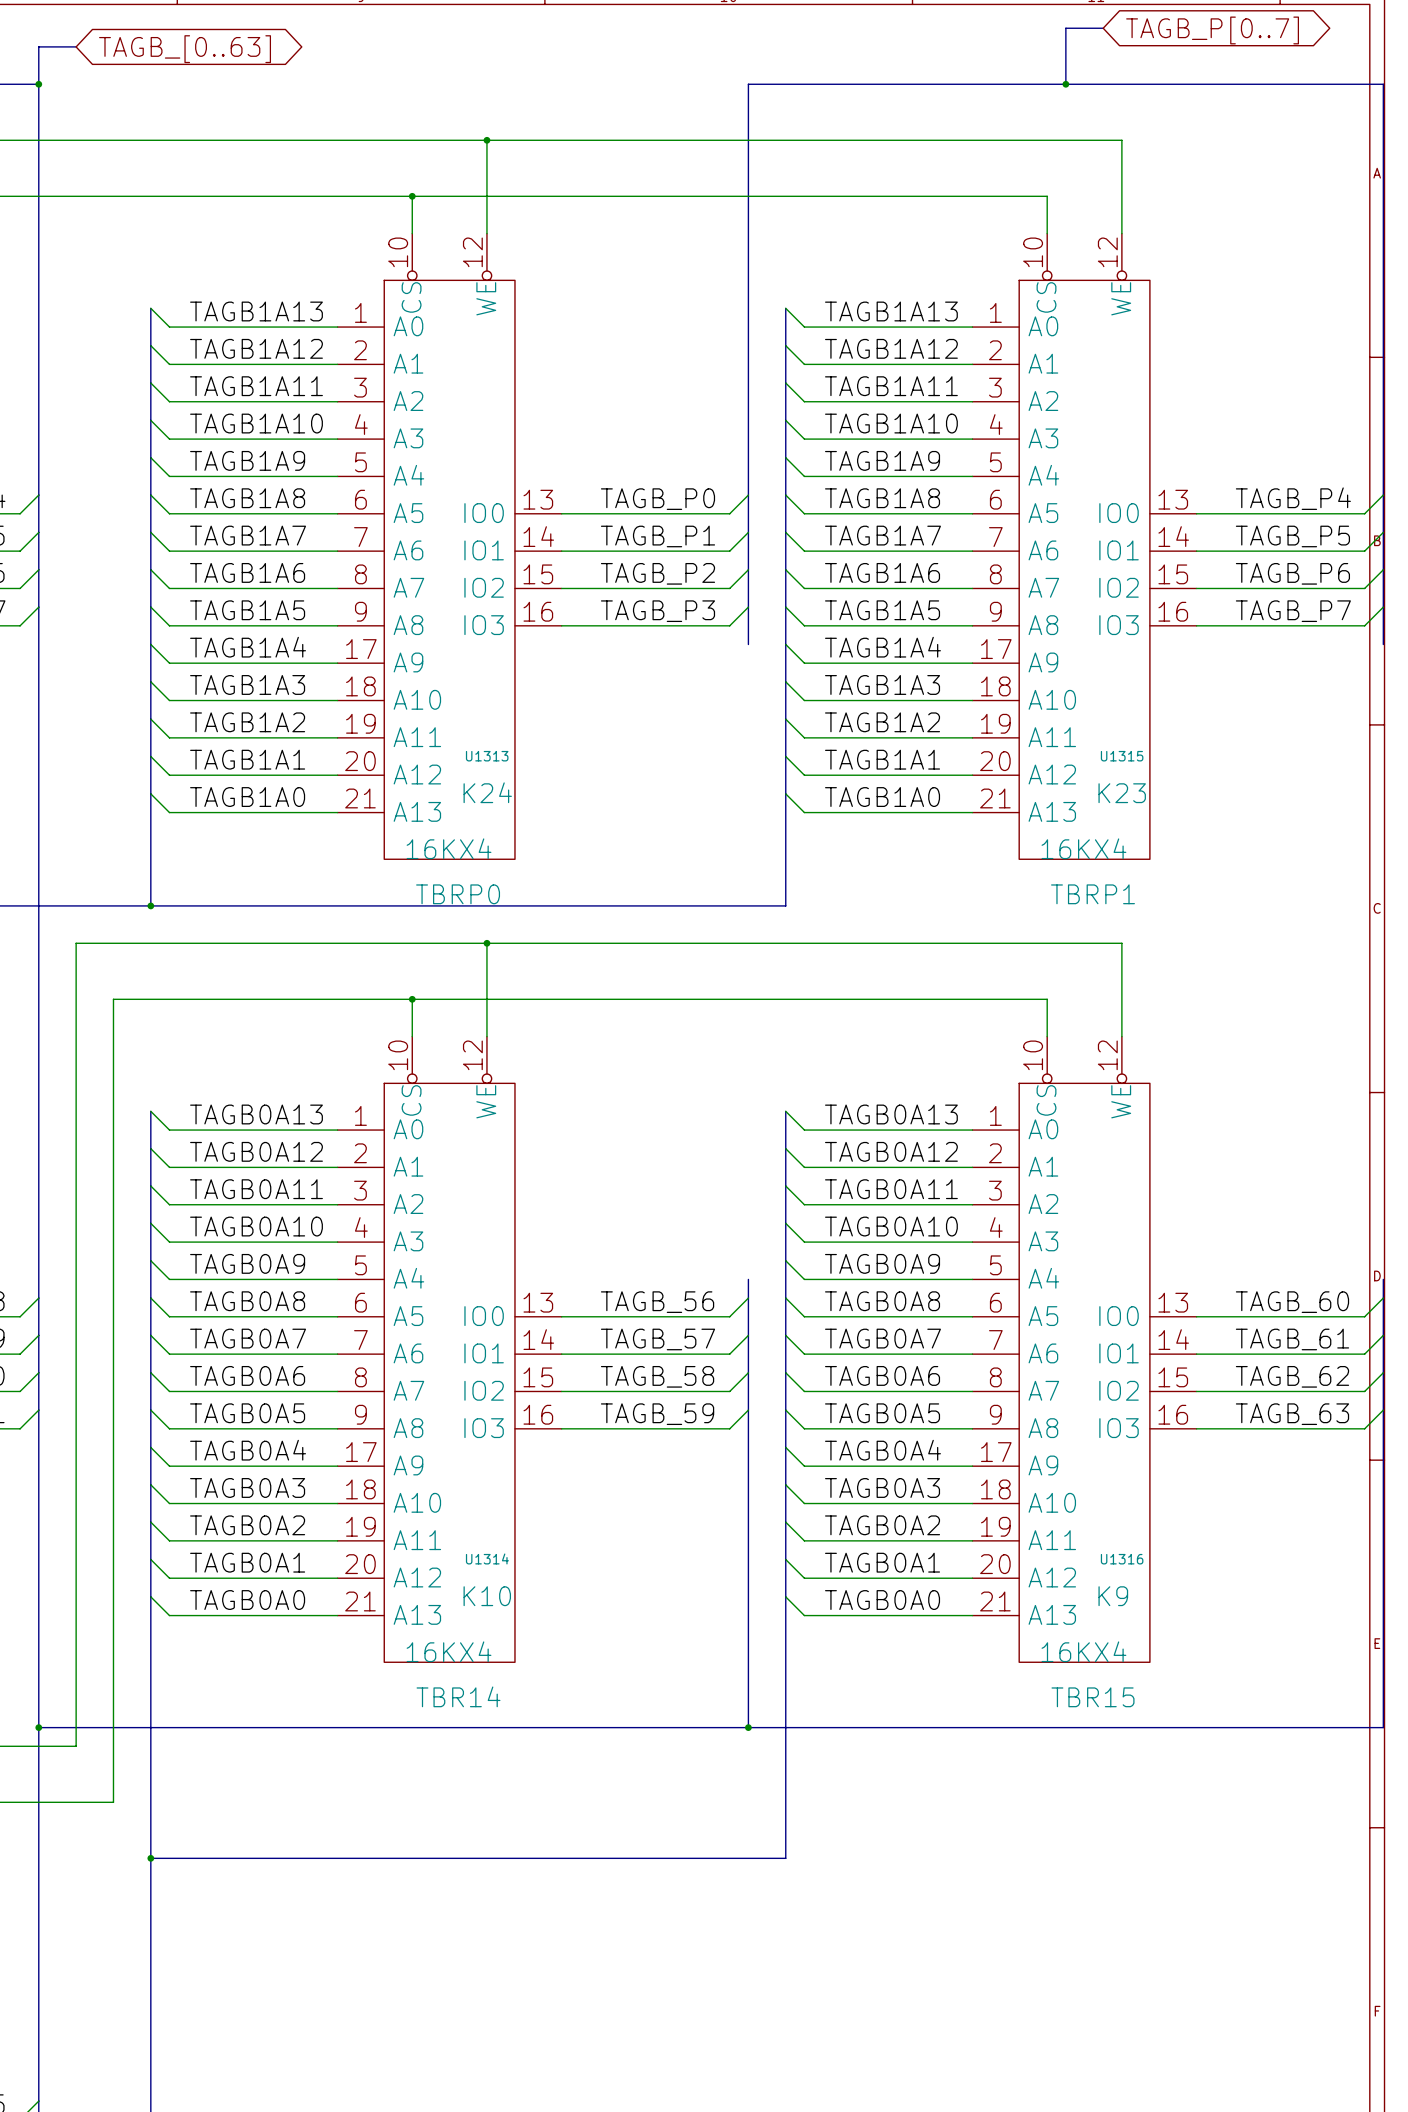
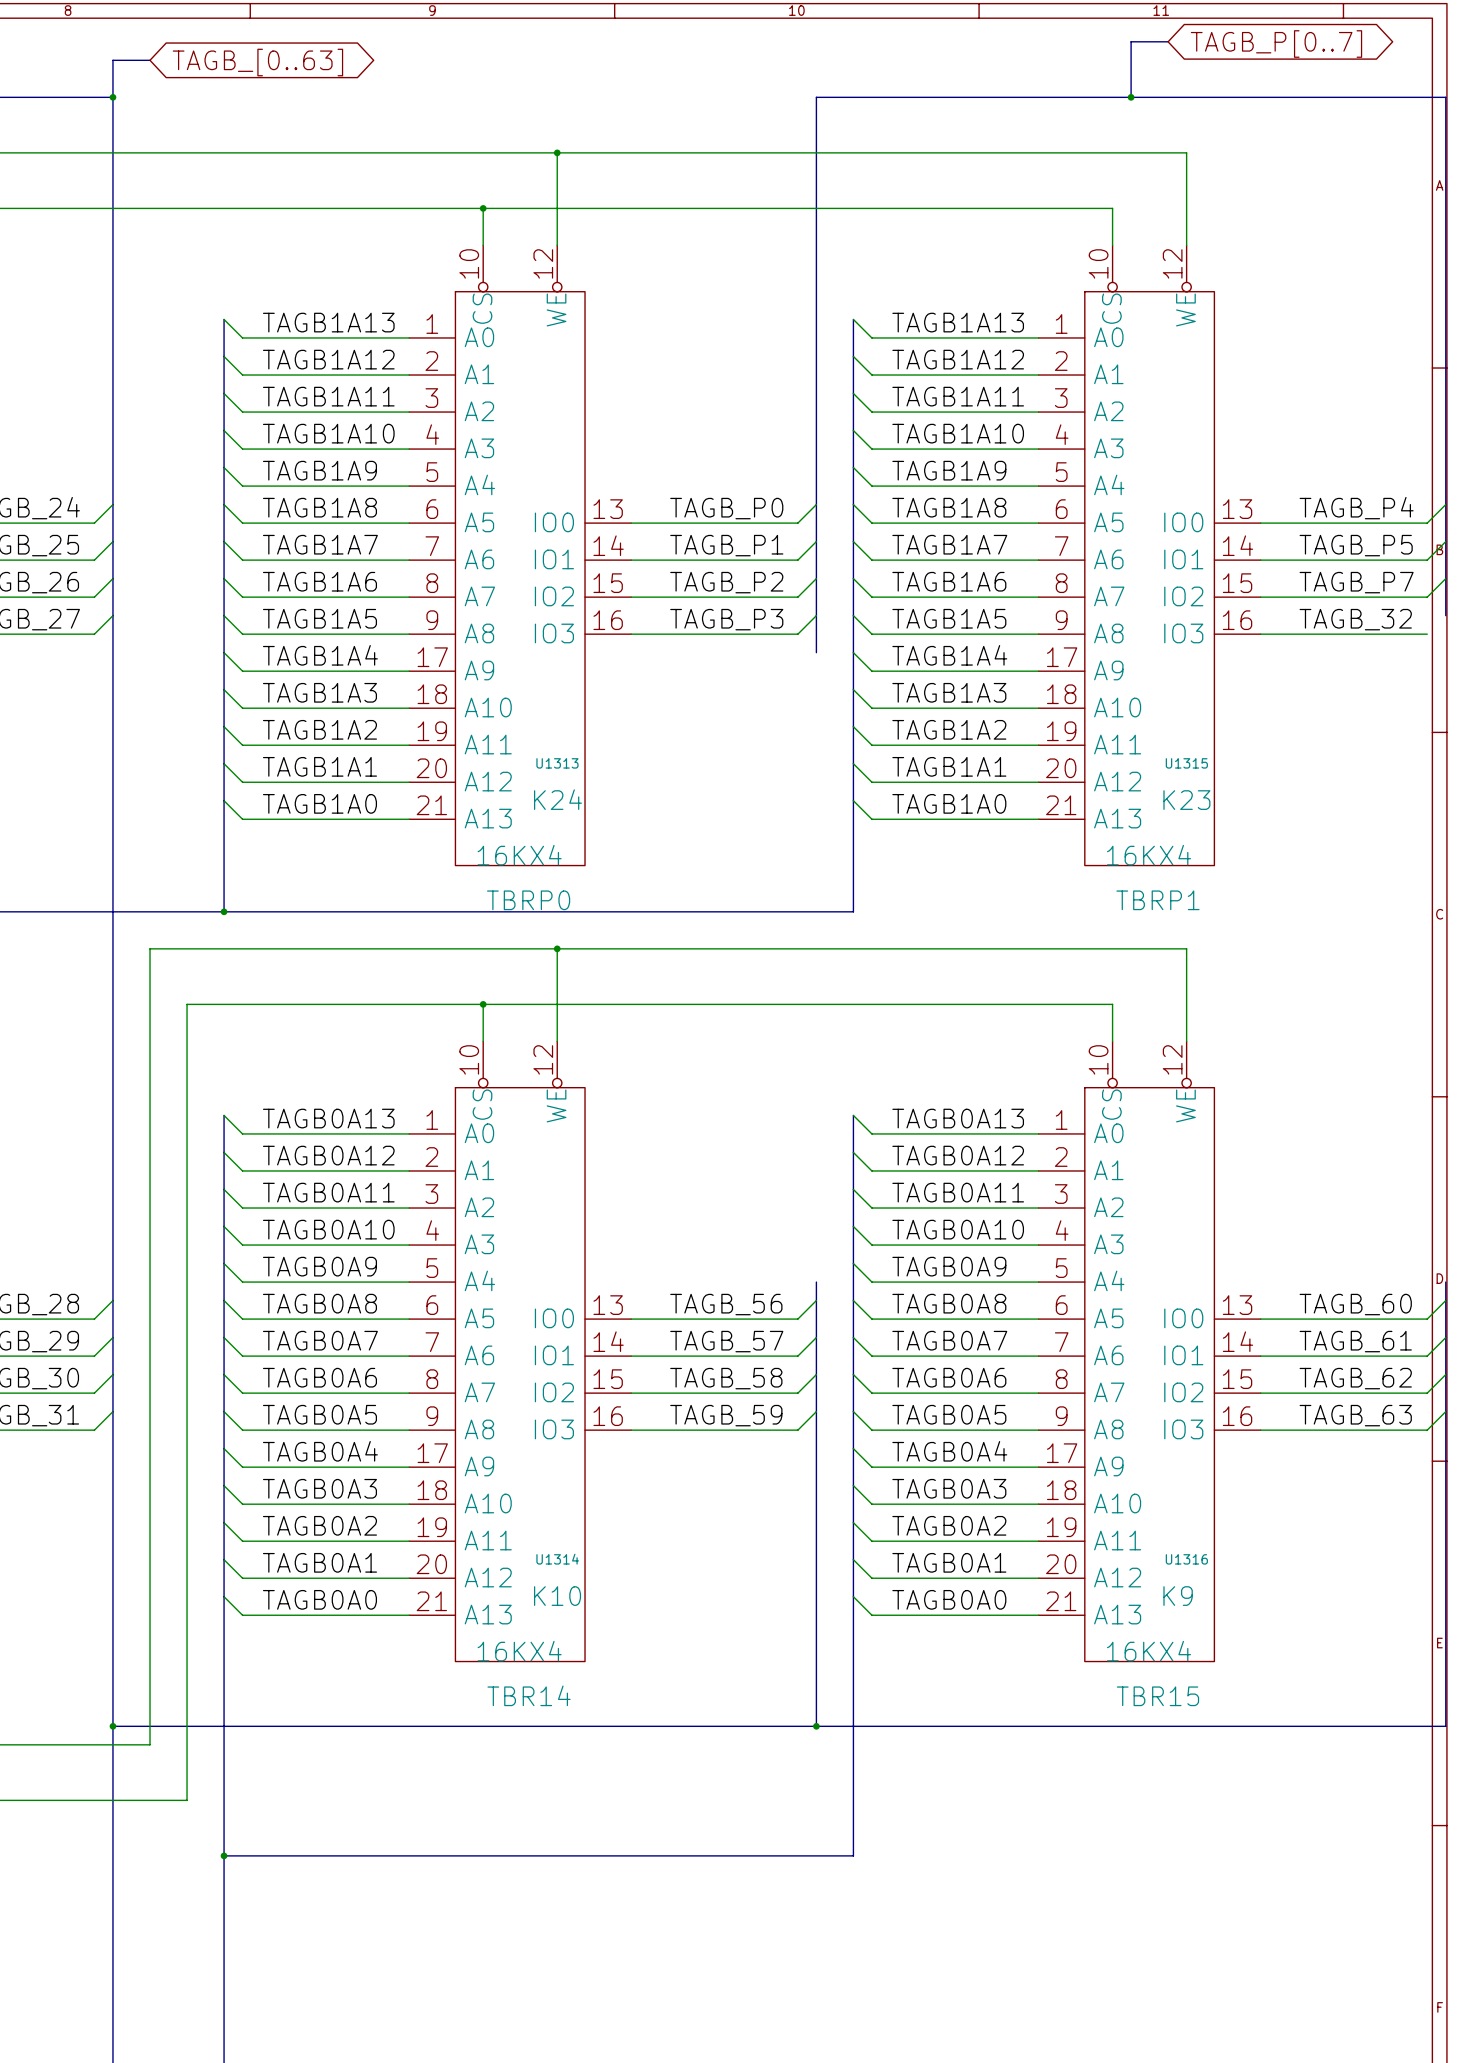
label: TAGB_P6 (1292, 573) -> TAGB_P7 (1356, 582)
bus: (1383, 607) (1383, 644) -> none
wire: (1383, 607) (1364, 625) -> none
label: TAGB_P7 (1293, 611) -> TAGB_32 (1355, 619)

